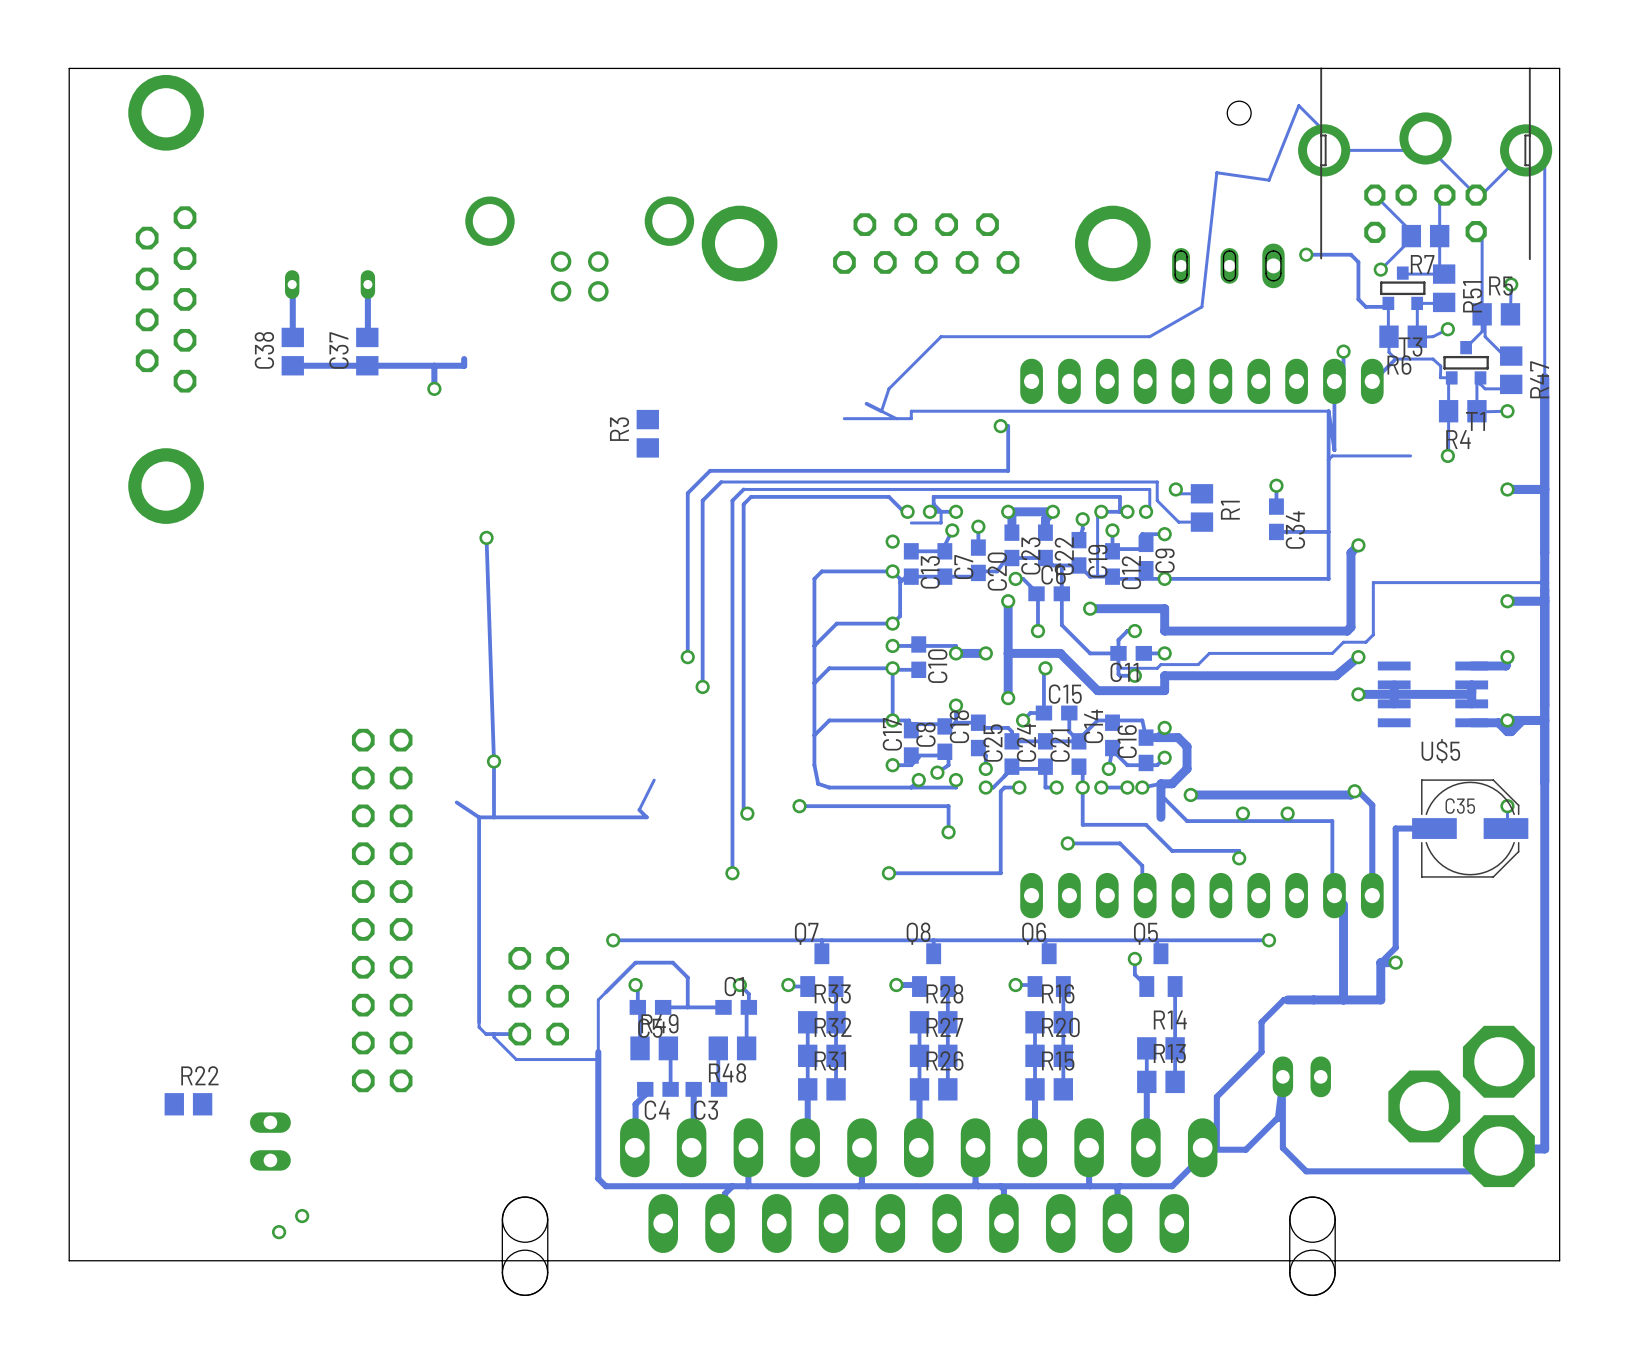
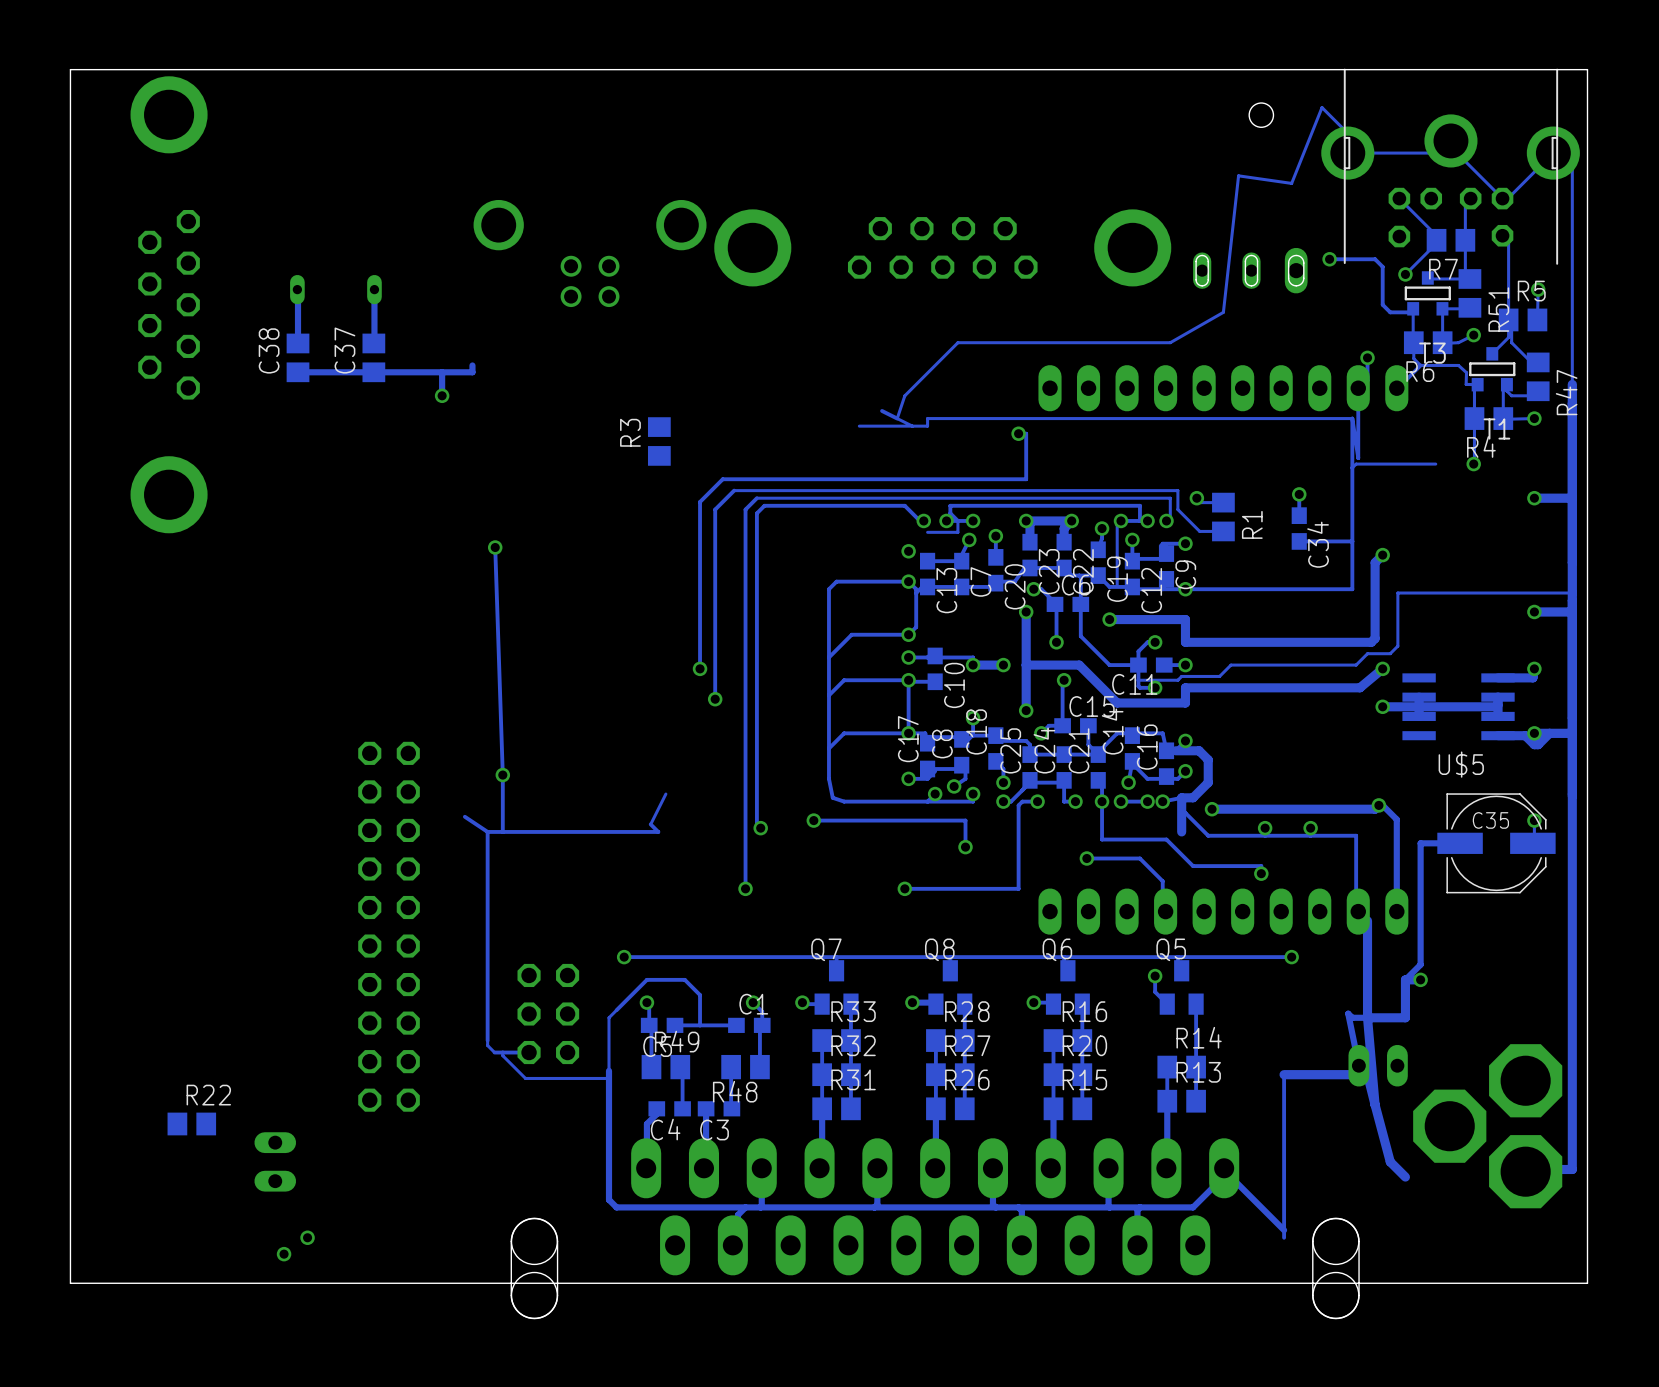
track: none -> (1352, 1017) (1348, 1013) (1358, 1065)
track: (1343, 999) (1283, 999) (1261, 1022) (1261, 1052) (1216, 1096) (1216, 1148) (1201, 1148) -> (1367, 1017) (1375, 1105)
part position: (1301, 1076) -> (1378, 1065)
track: none -> (1375, 1105) (1390, 1161) (1405, 1177)
track: none -> (1375, 1105) (1367, 1074) (1284, 1074) (1284, 1237)
track: (1202, 1149) (1245, 1149) (1277, 1119) (1282, 1076) (1282, 1147) (1306, 1171) (1478, 1171) (1498, 1151) -> (1224, 1170) (1284, 1230)

